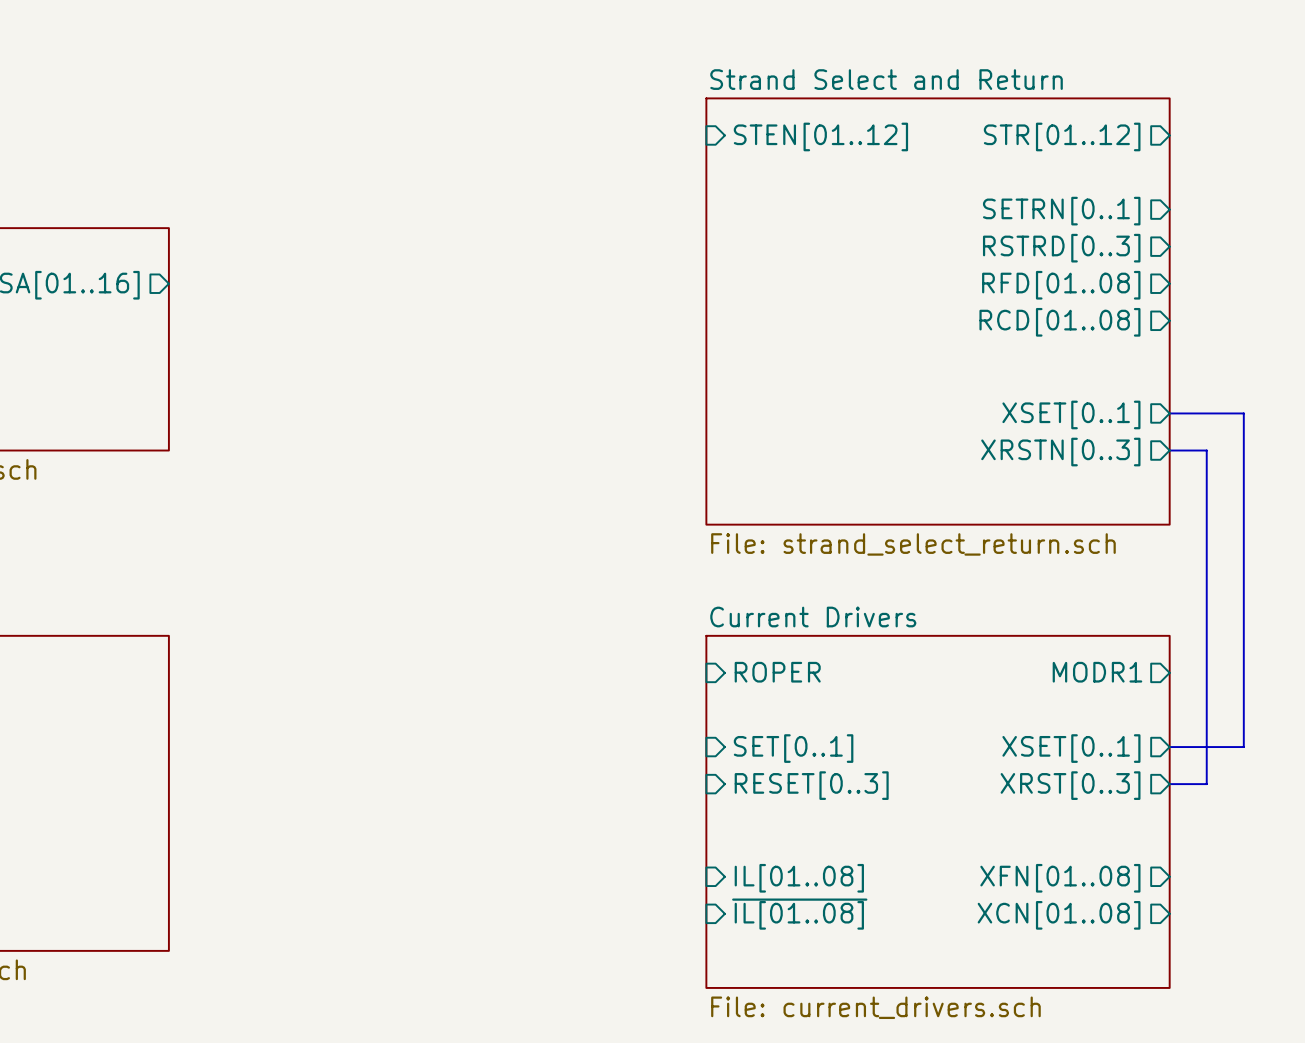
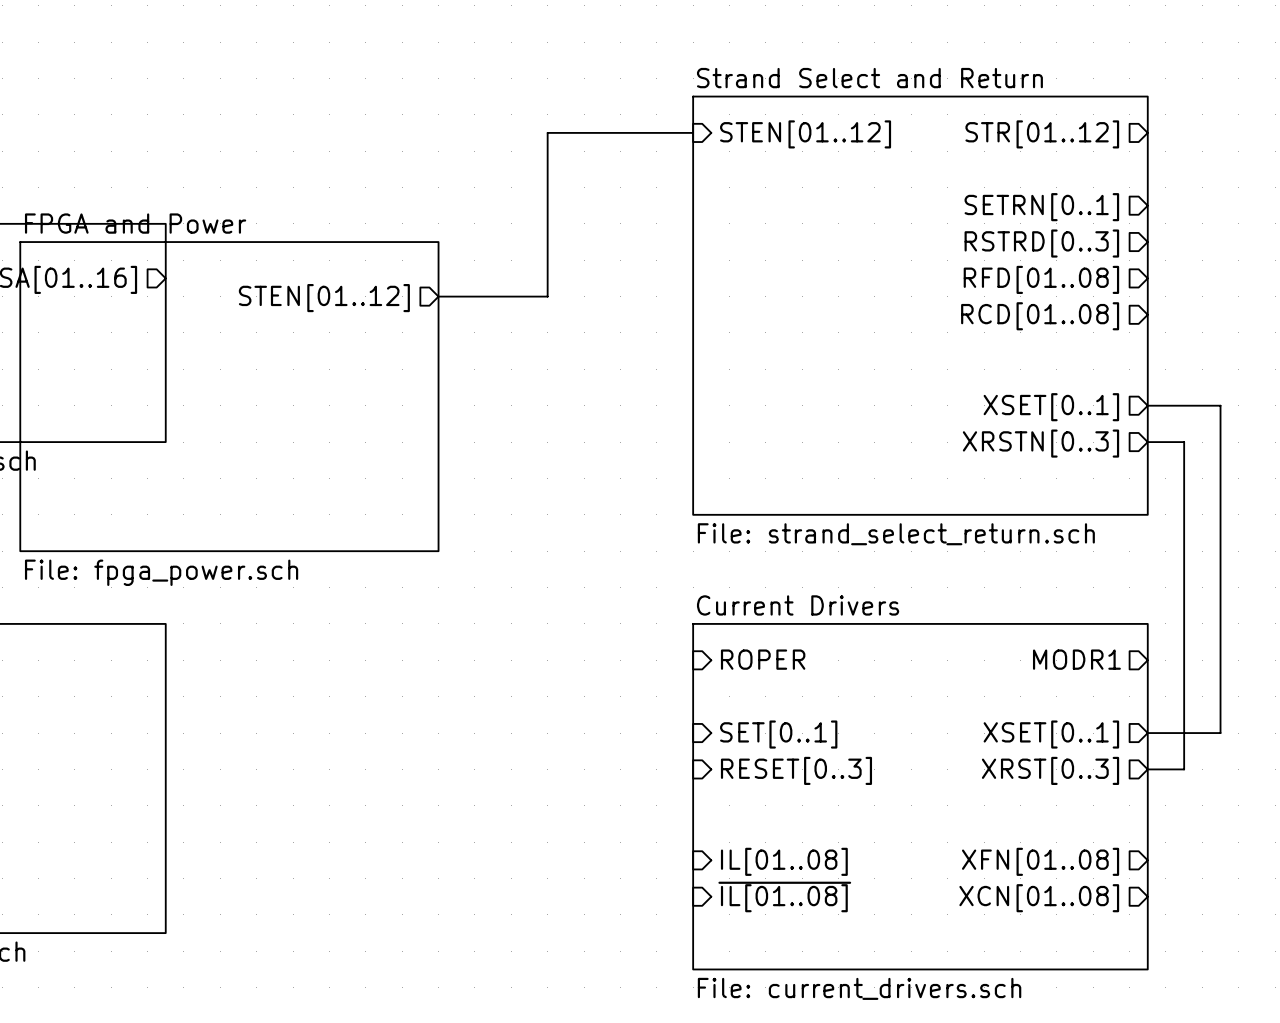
bus: none -> (693, 132) (547, 132) (547, 296) (438, 296)
sheet pin: none -> STEN[01..12] (324, 298)
sheet FPGA and Power: none -> File: fpga_power.sch (229, 396)

